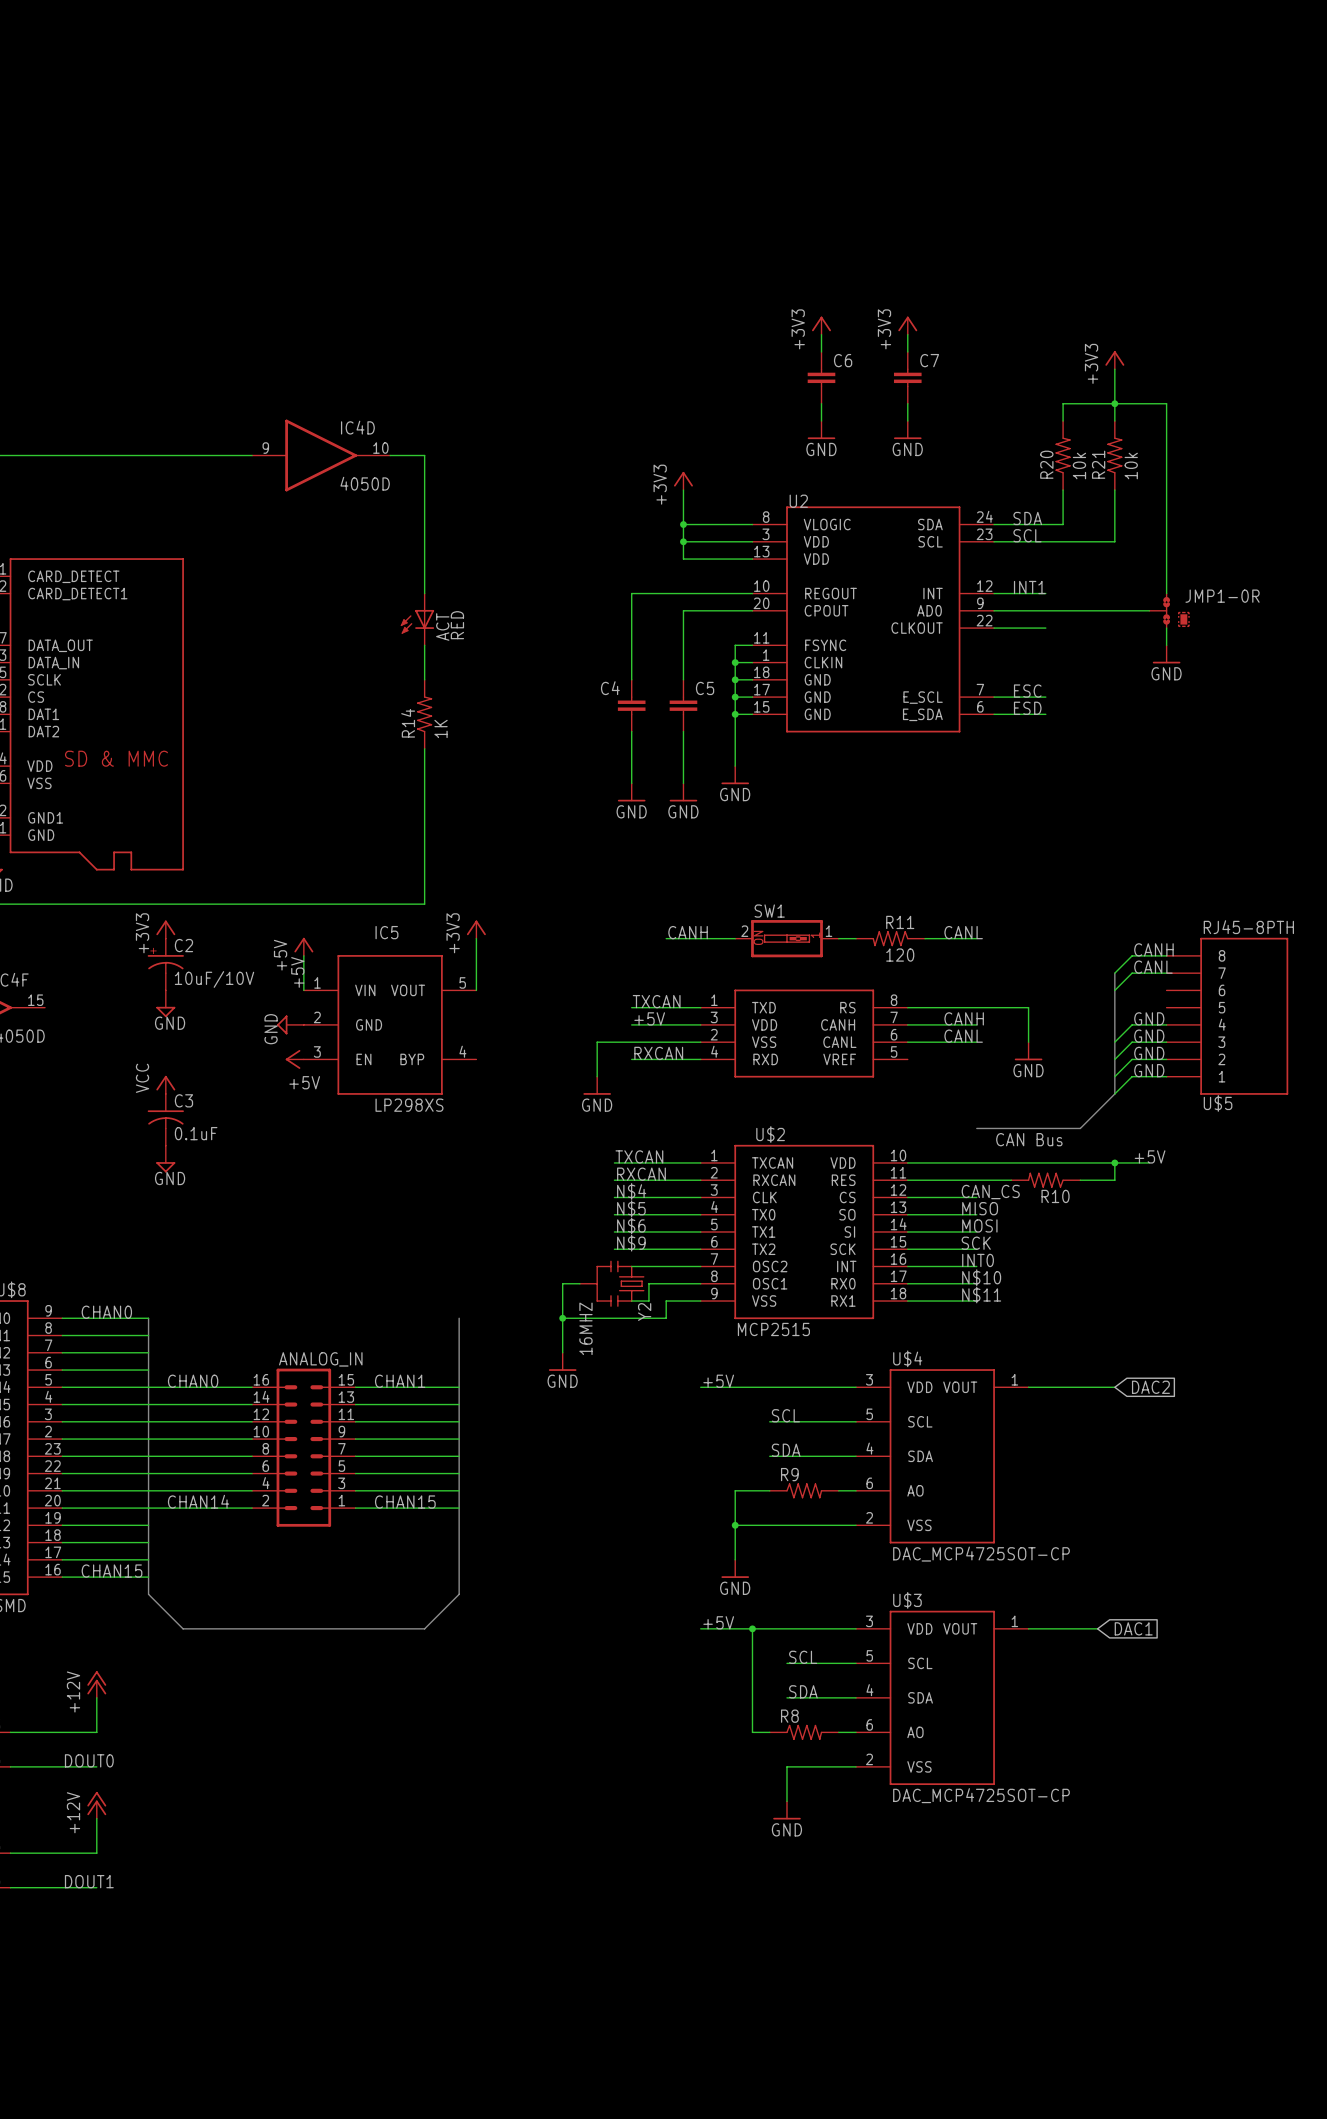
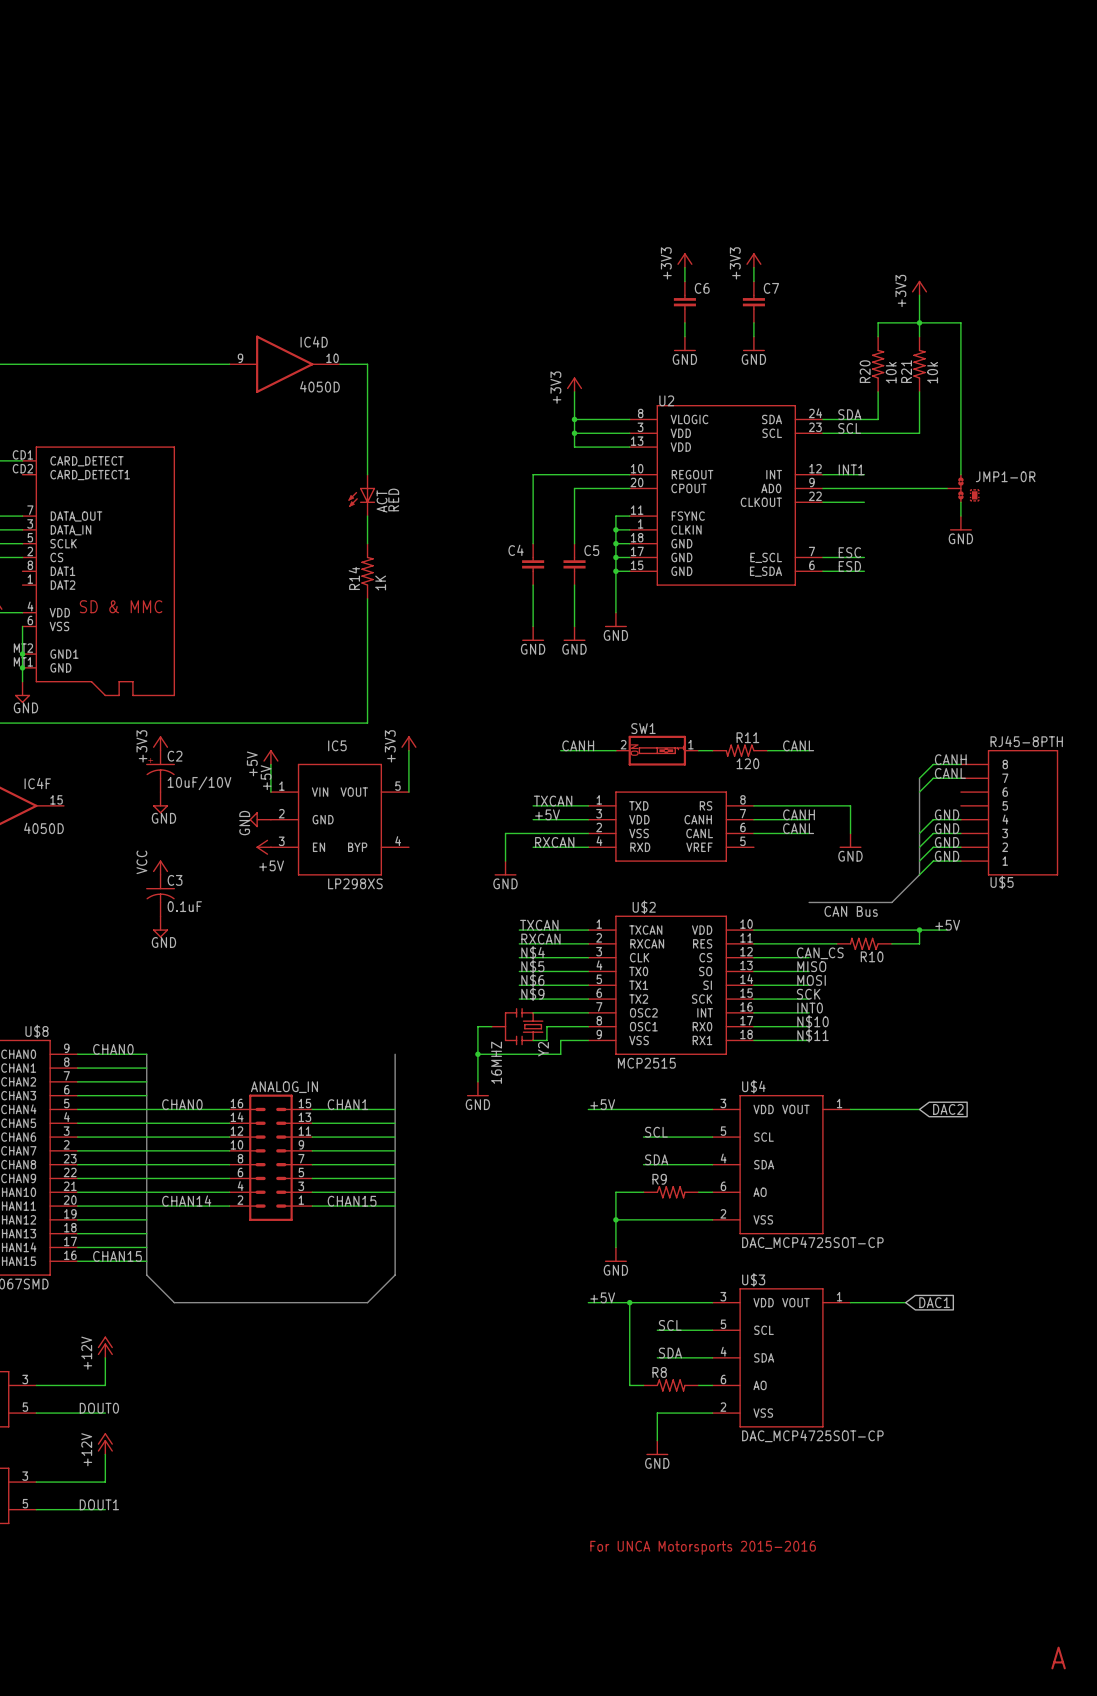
text: none -> For UNCA Motorsports 2015-2016 (703, 1547)
text: none -> A (1058, 1658)

